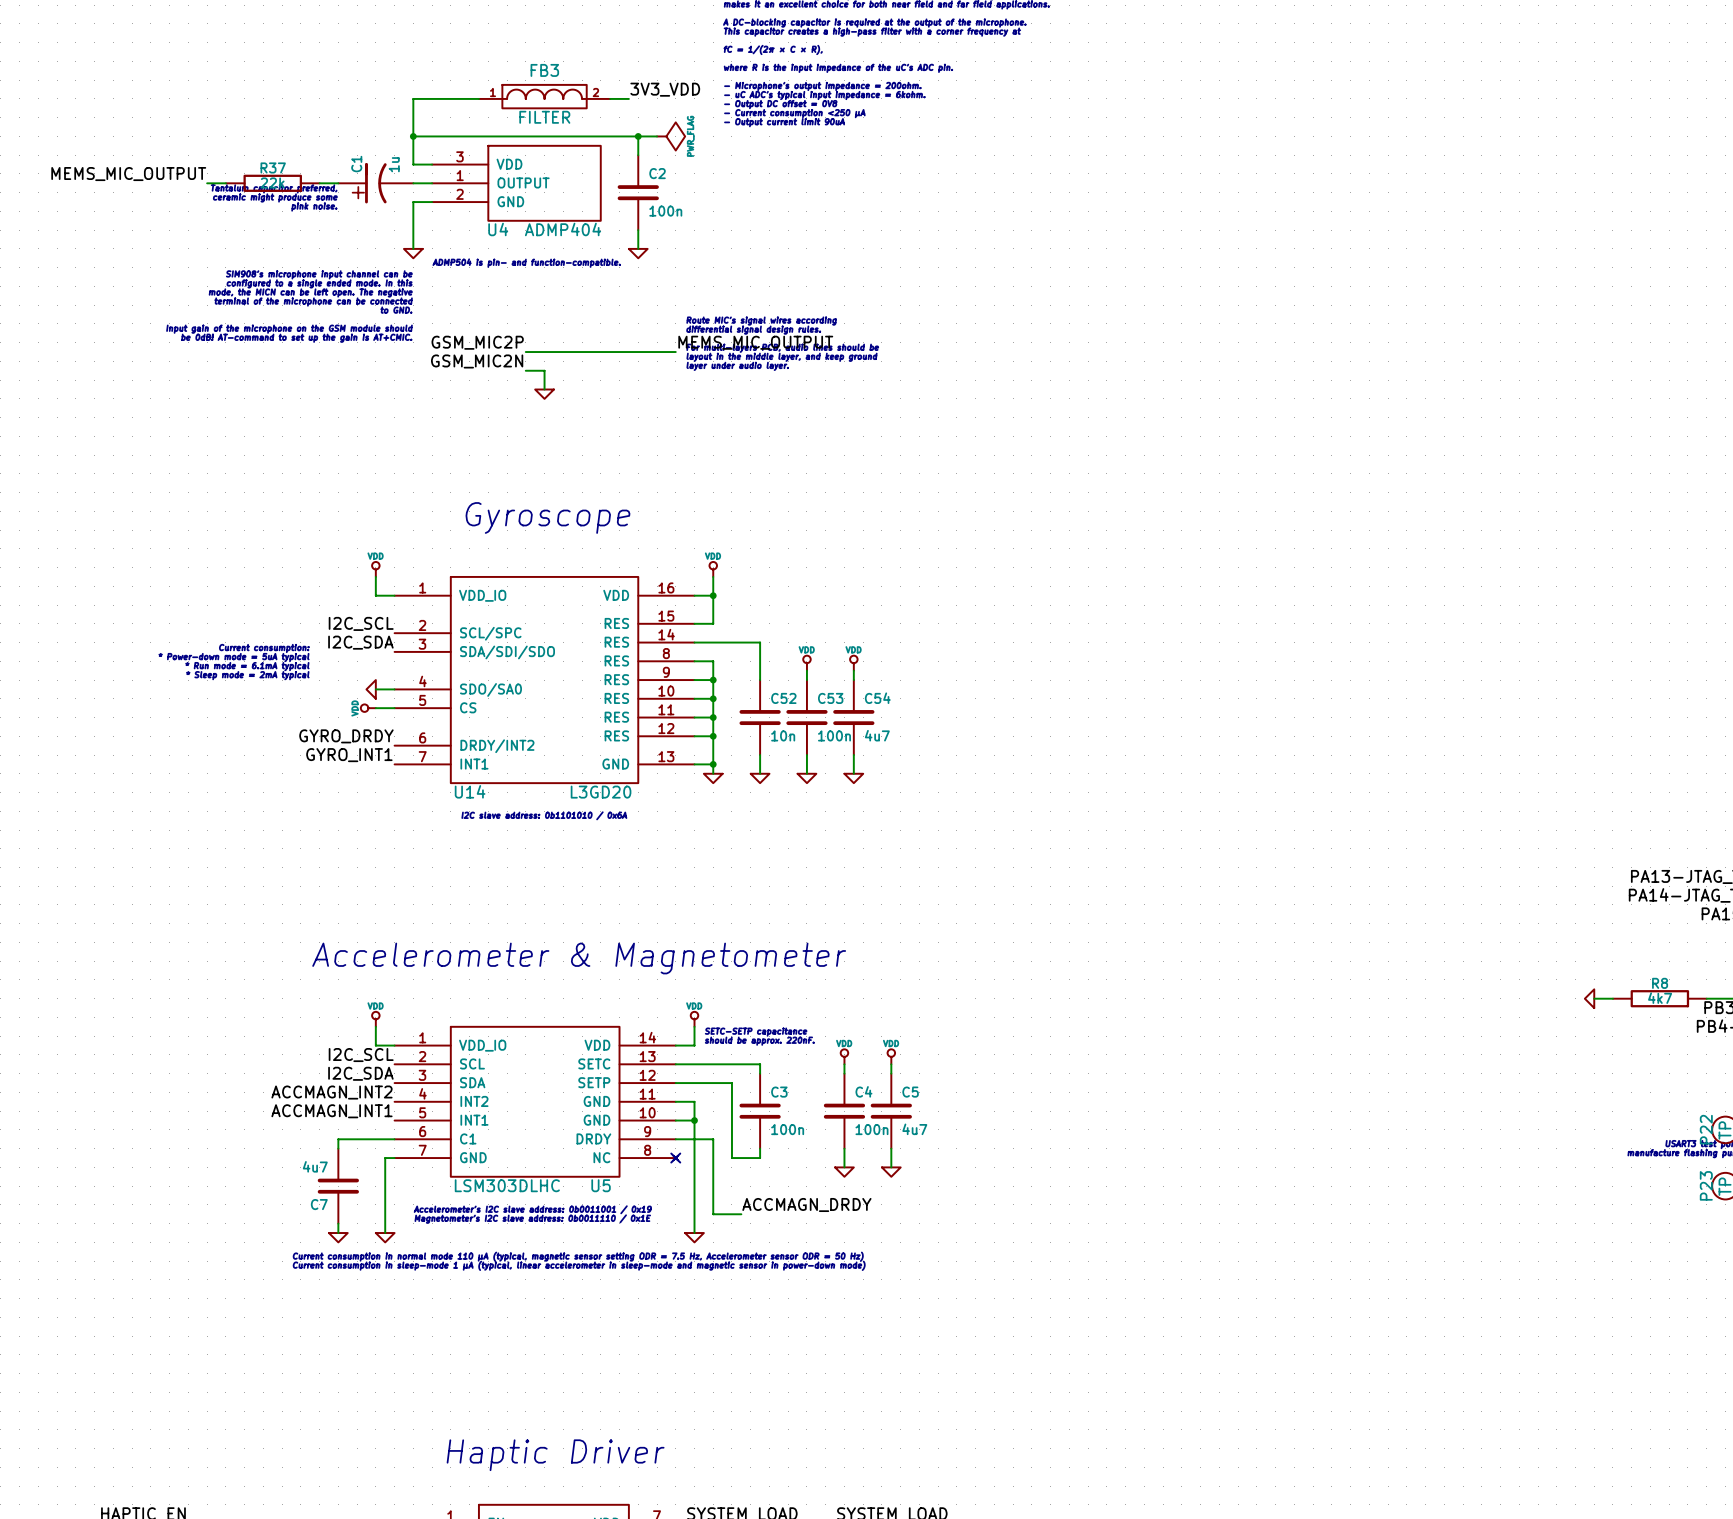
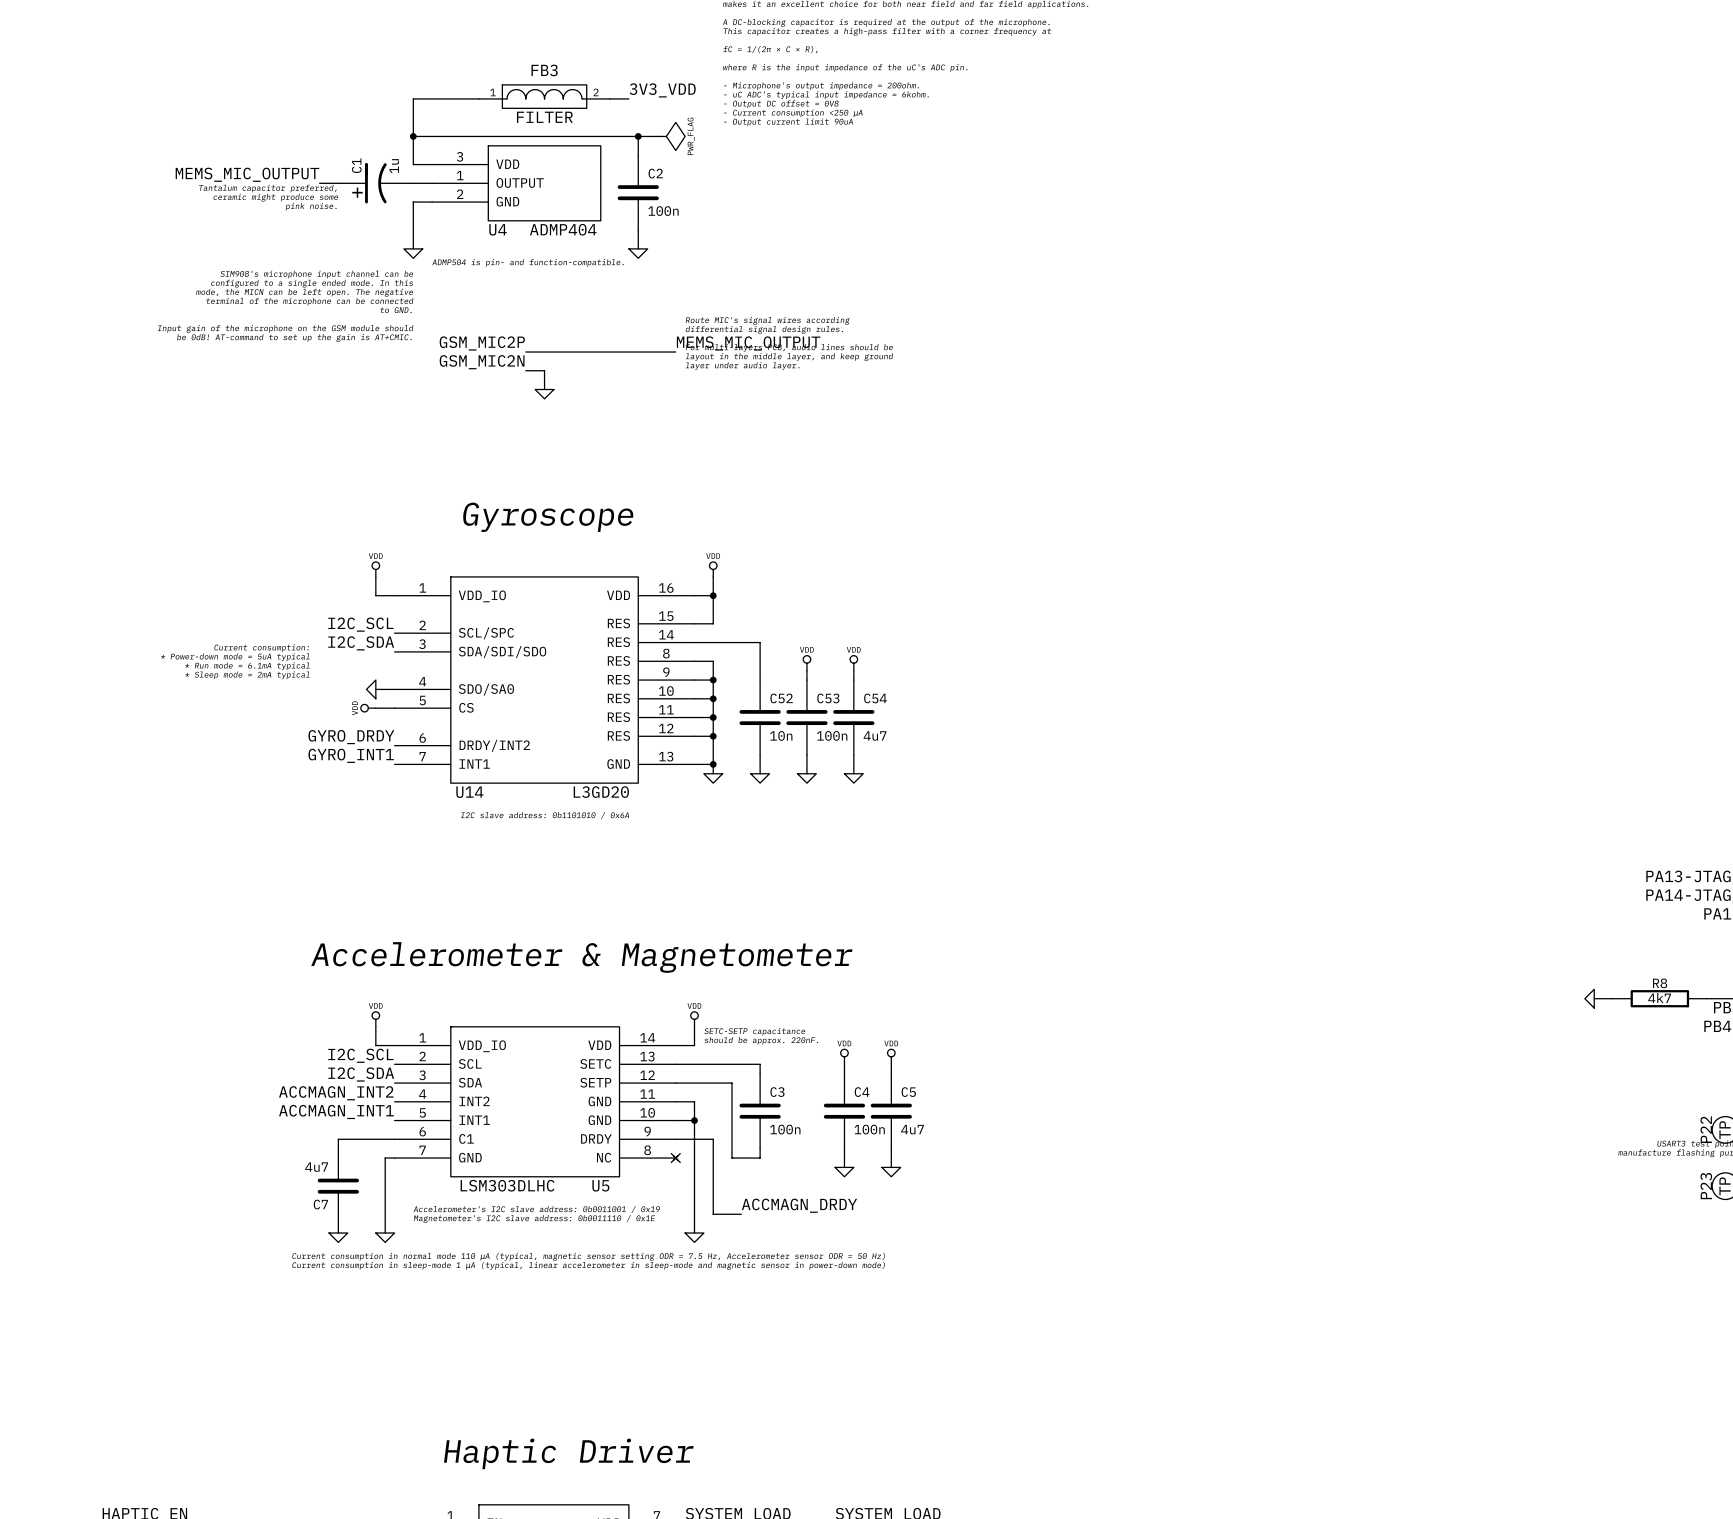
label position: MEMS_MIC_OUTPUT (128, 174) -> MEMS_MIC_OUTPUT (247, 174)
wire: (207, 183) (225, 183) -> none
R37: 22k (272, 183) -> none

